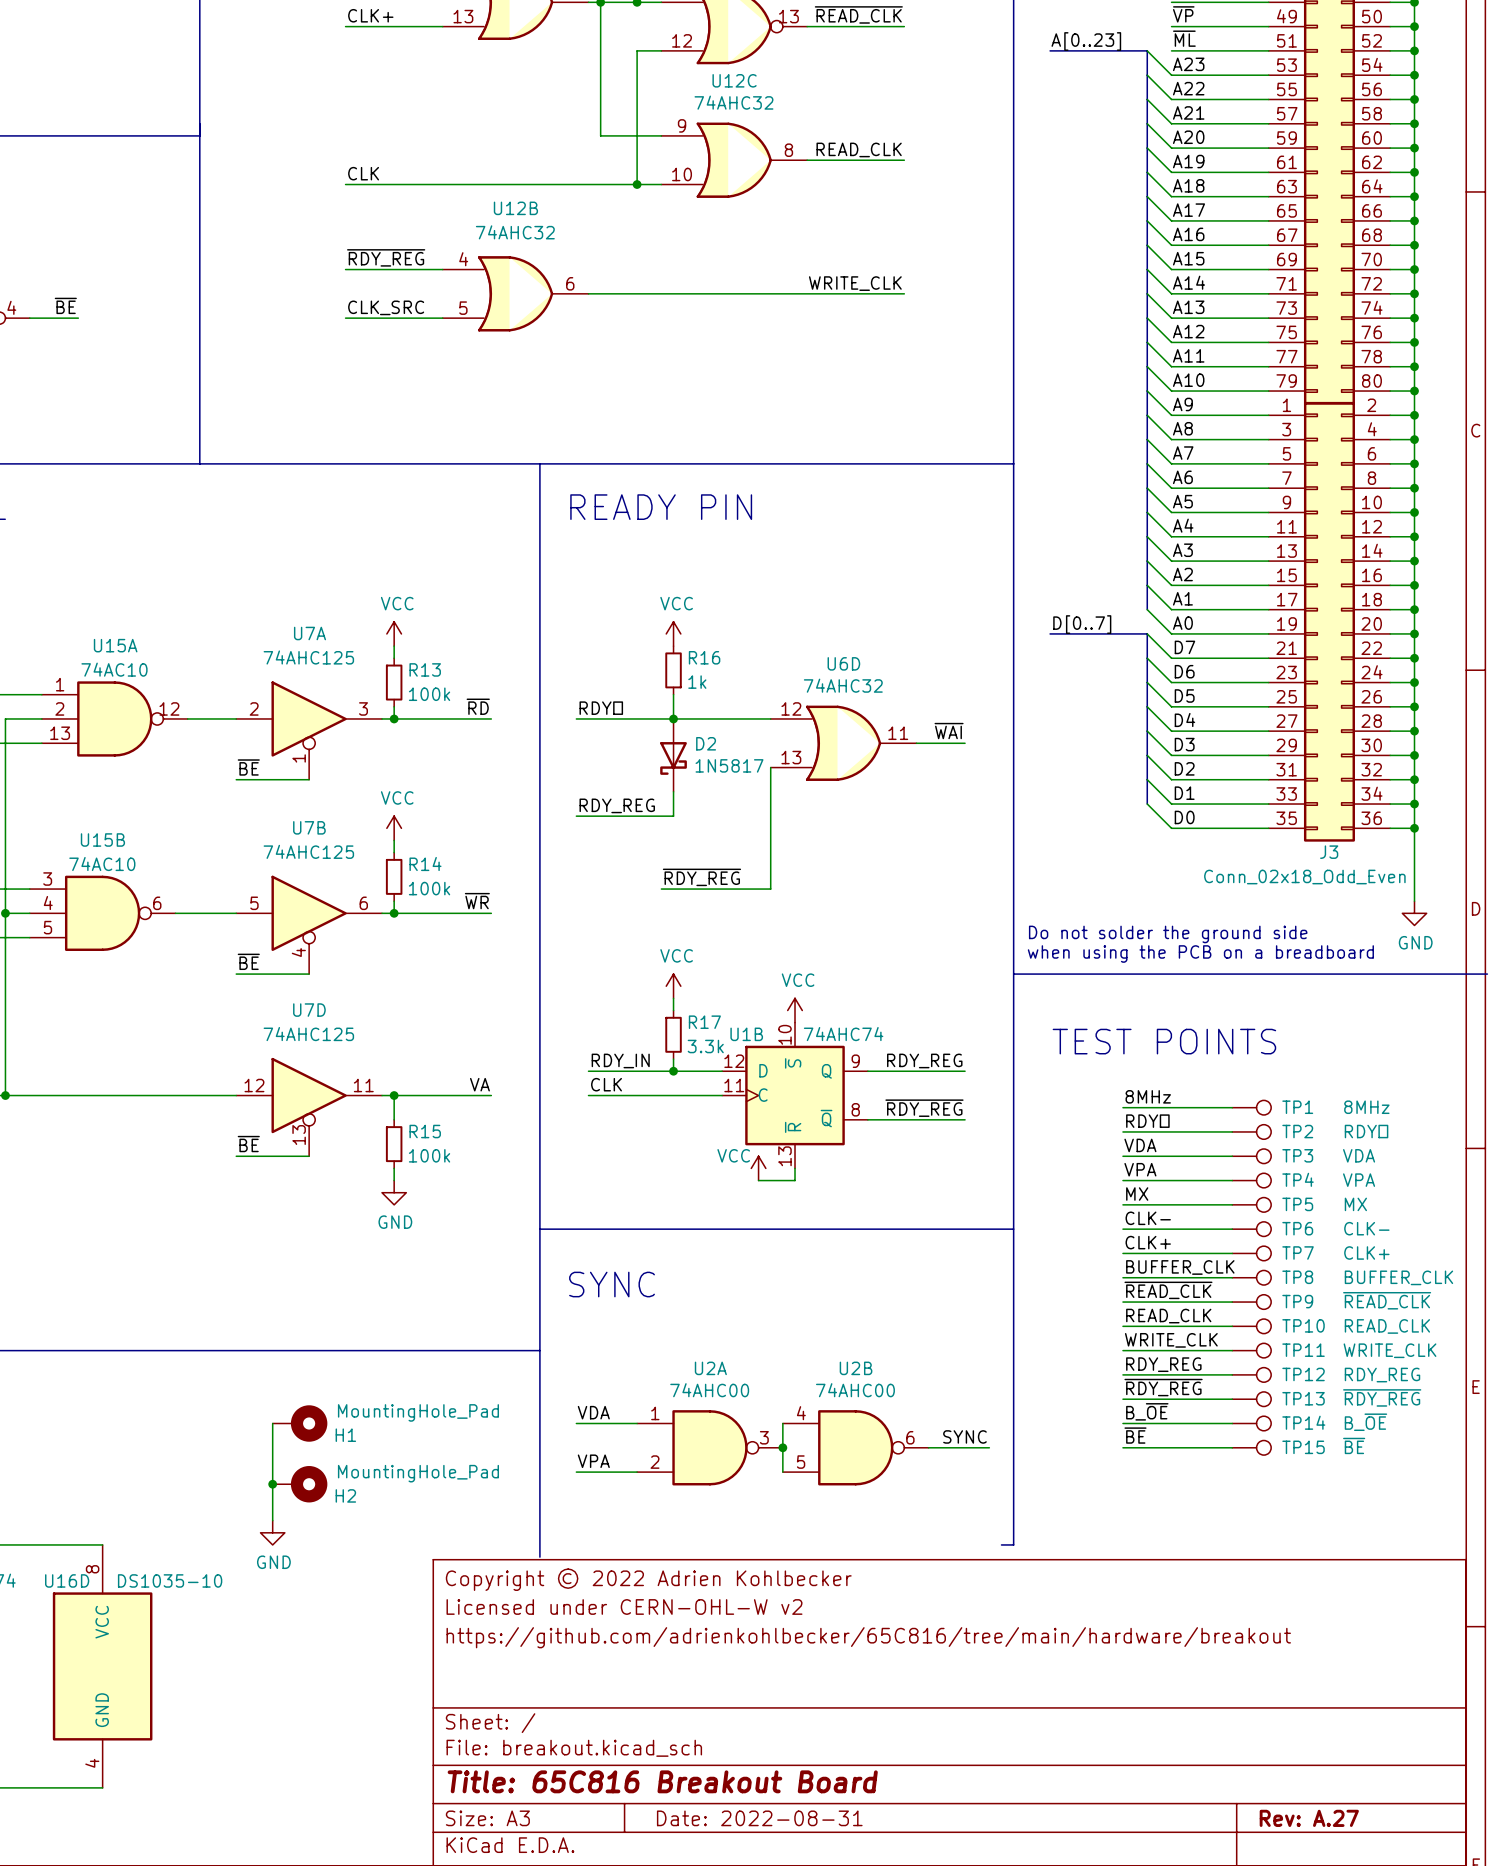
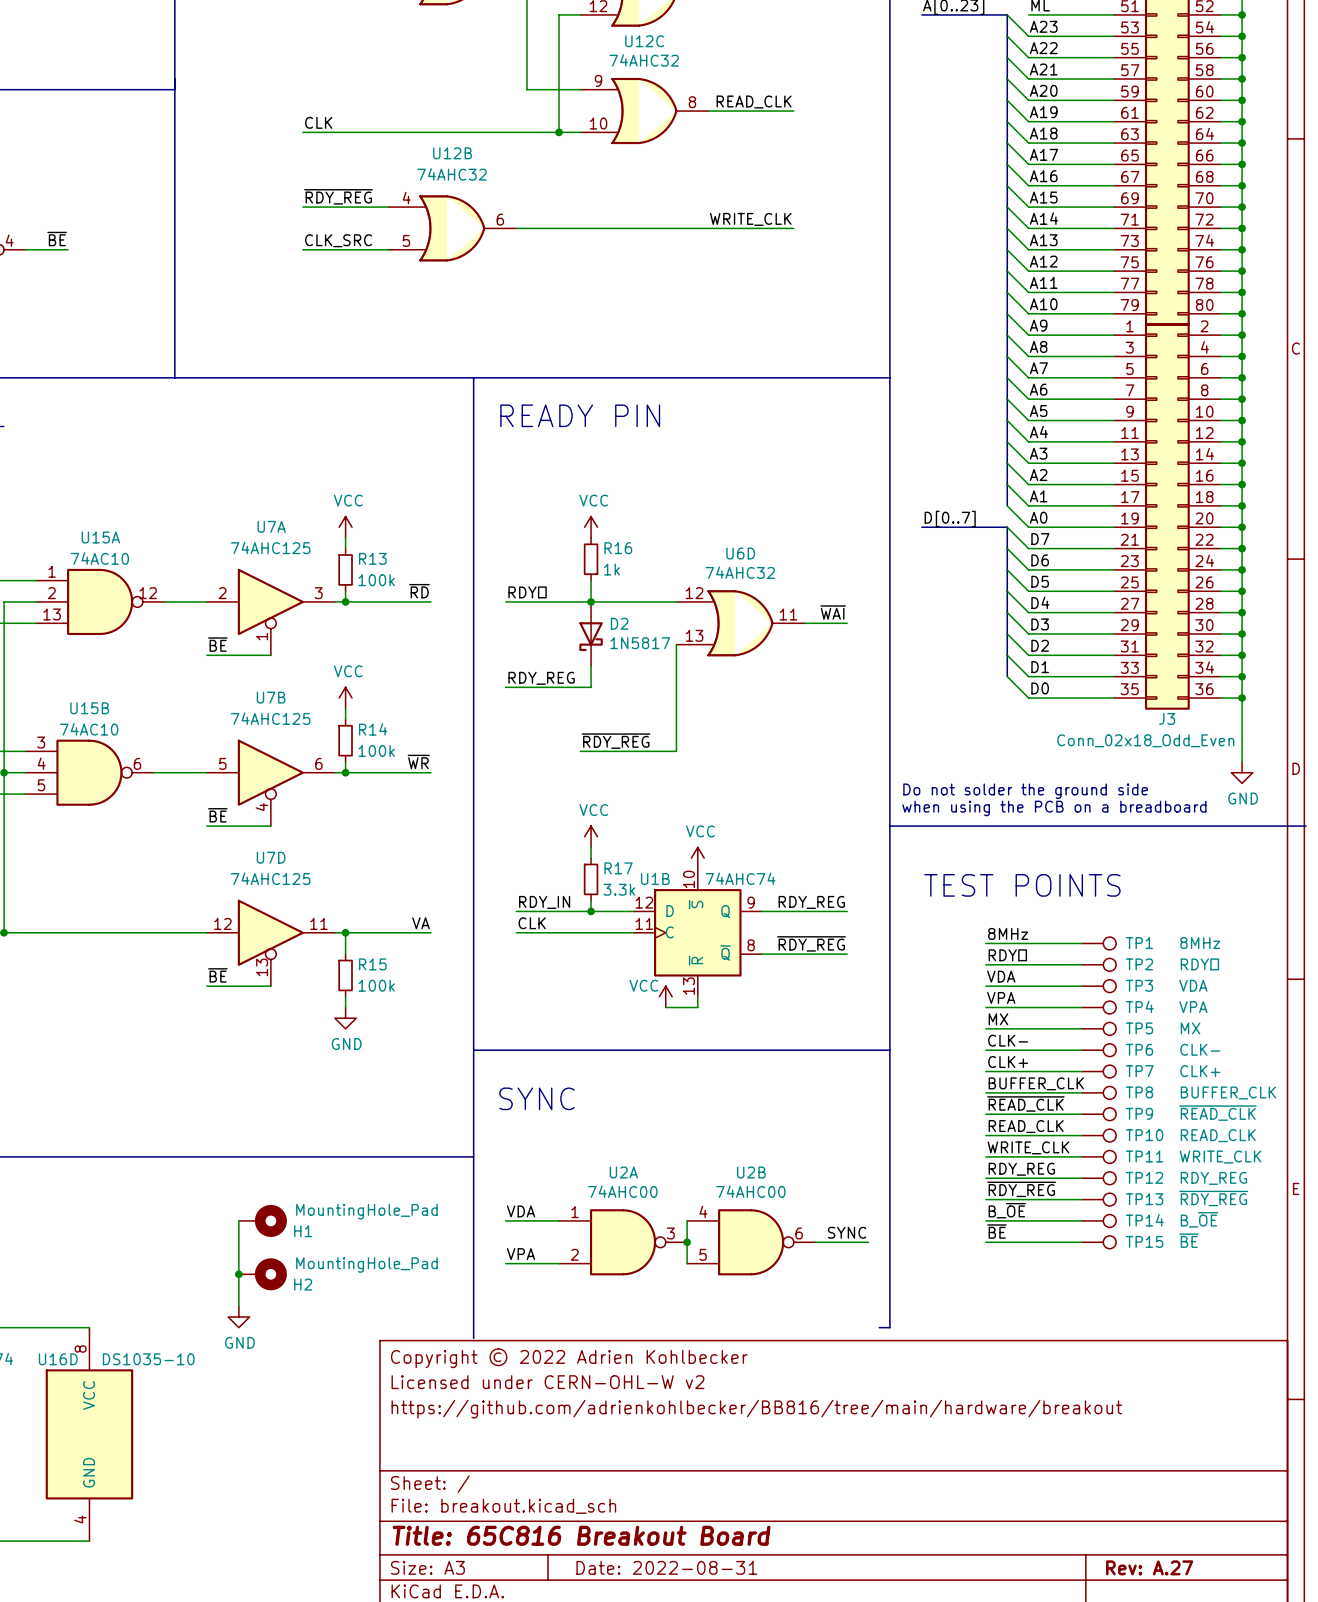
title block: https://github.com/adrienkohlbecker/65C816/tree/main/hardware/breakout (868, 1637) -> https://github.com/adrienkohlbecker/BB816/tree/main/hardware/breakout (756, 1409)

